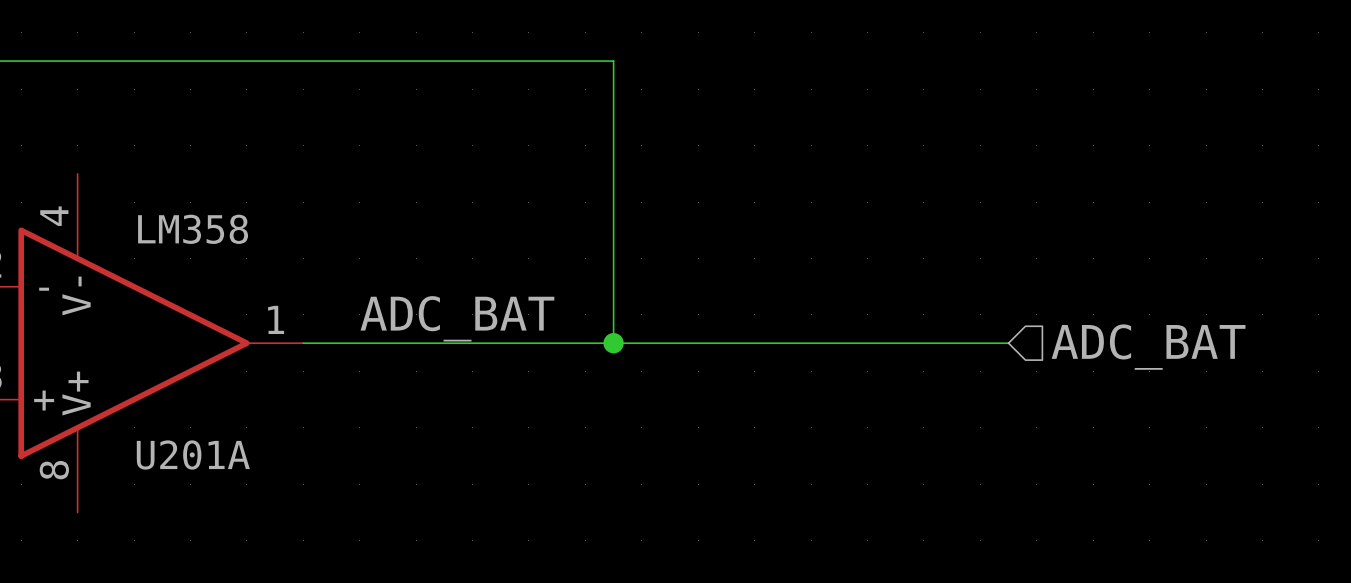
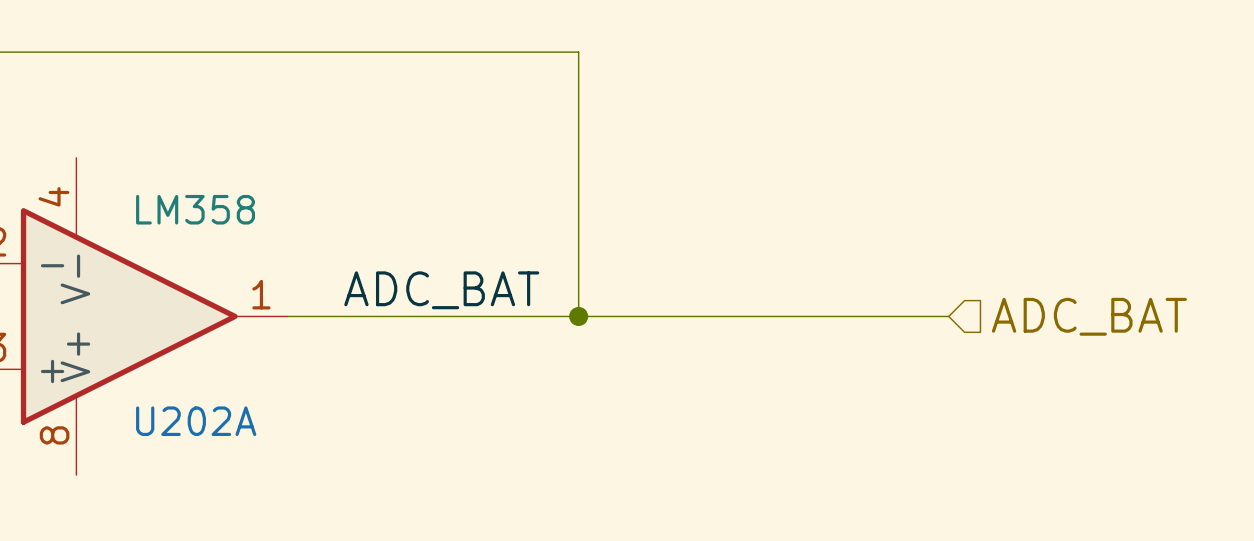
U201A name: U201A (193, 454) -> U202A (196, 421)

